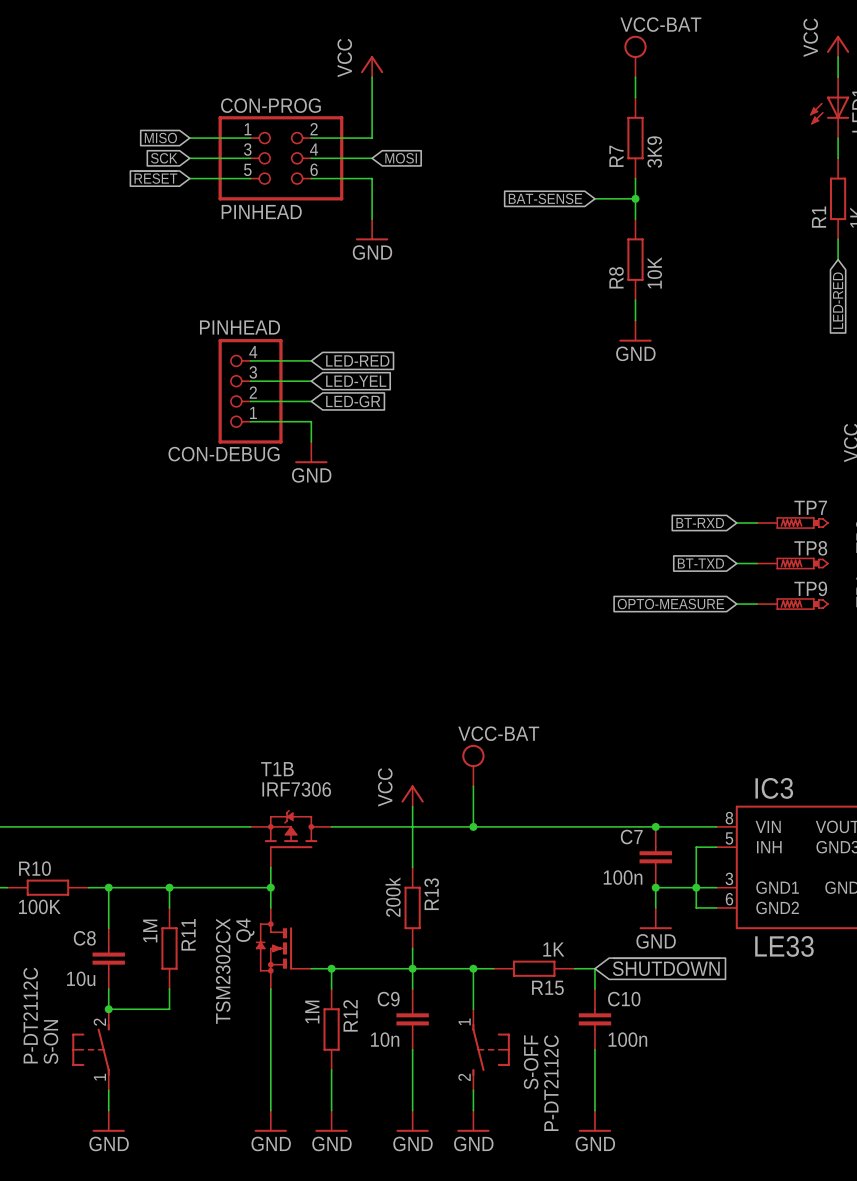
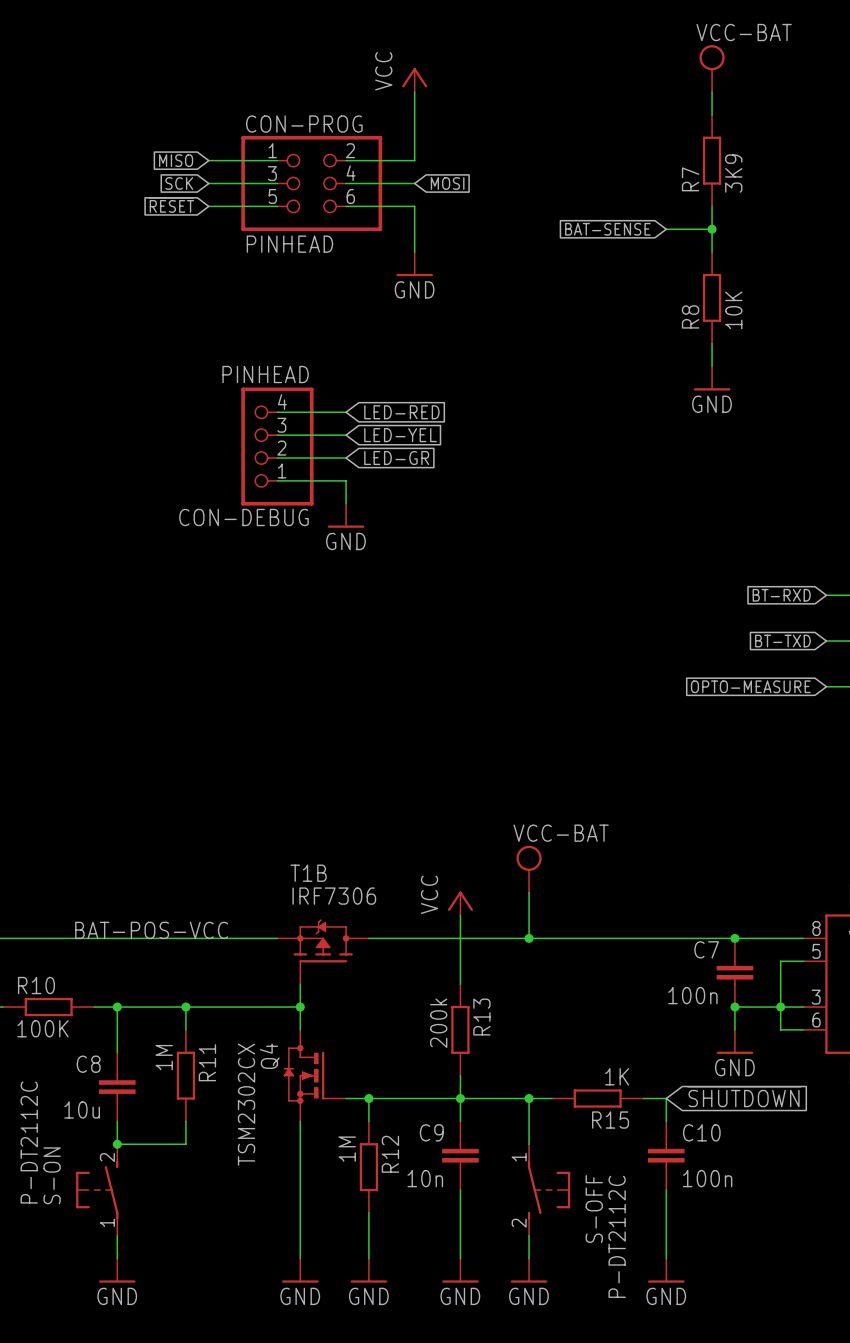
label: none -> BAT-POS-VCC (151, 930)

